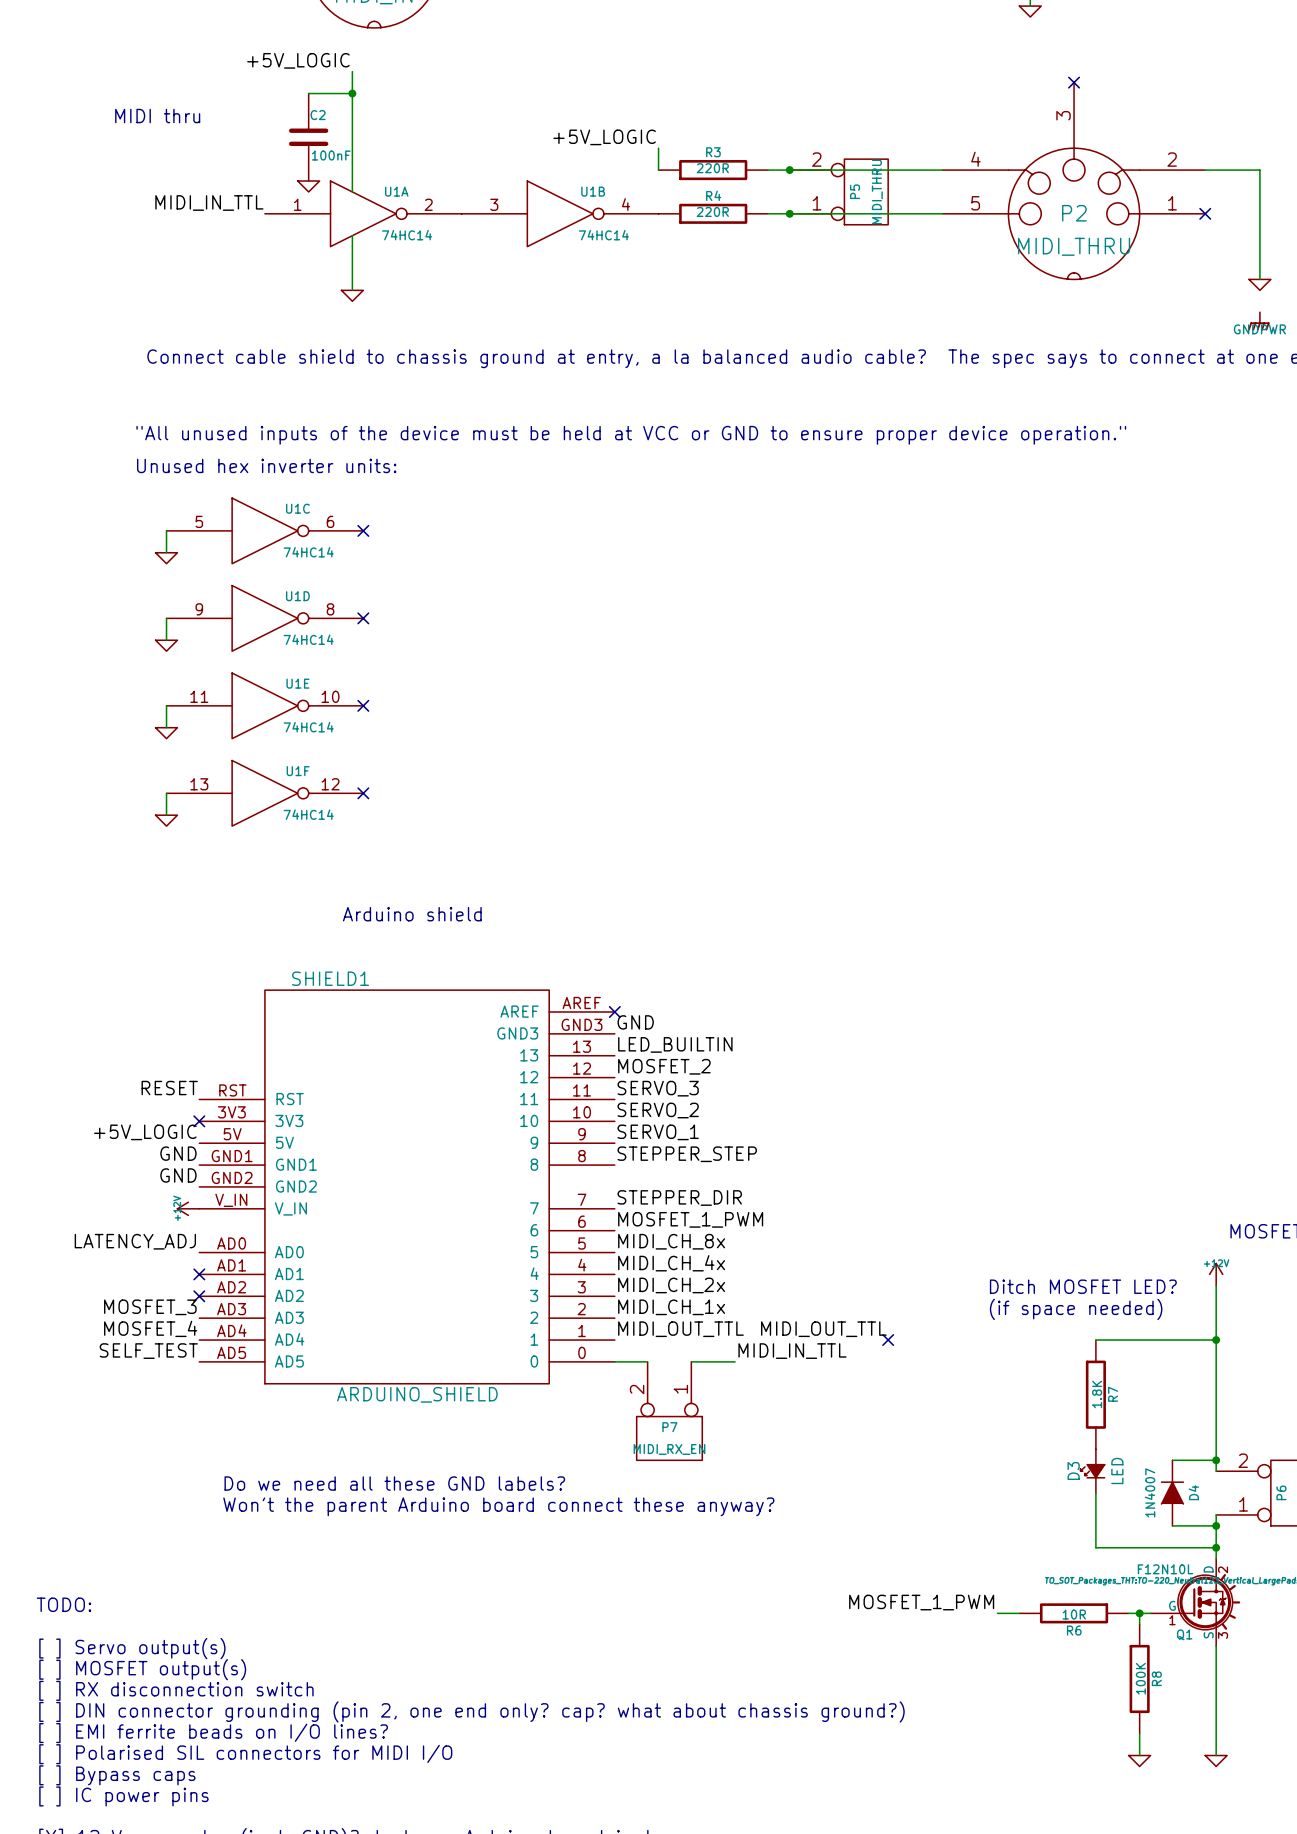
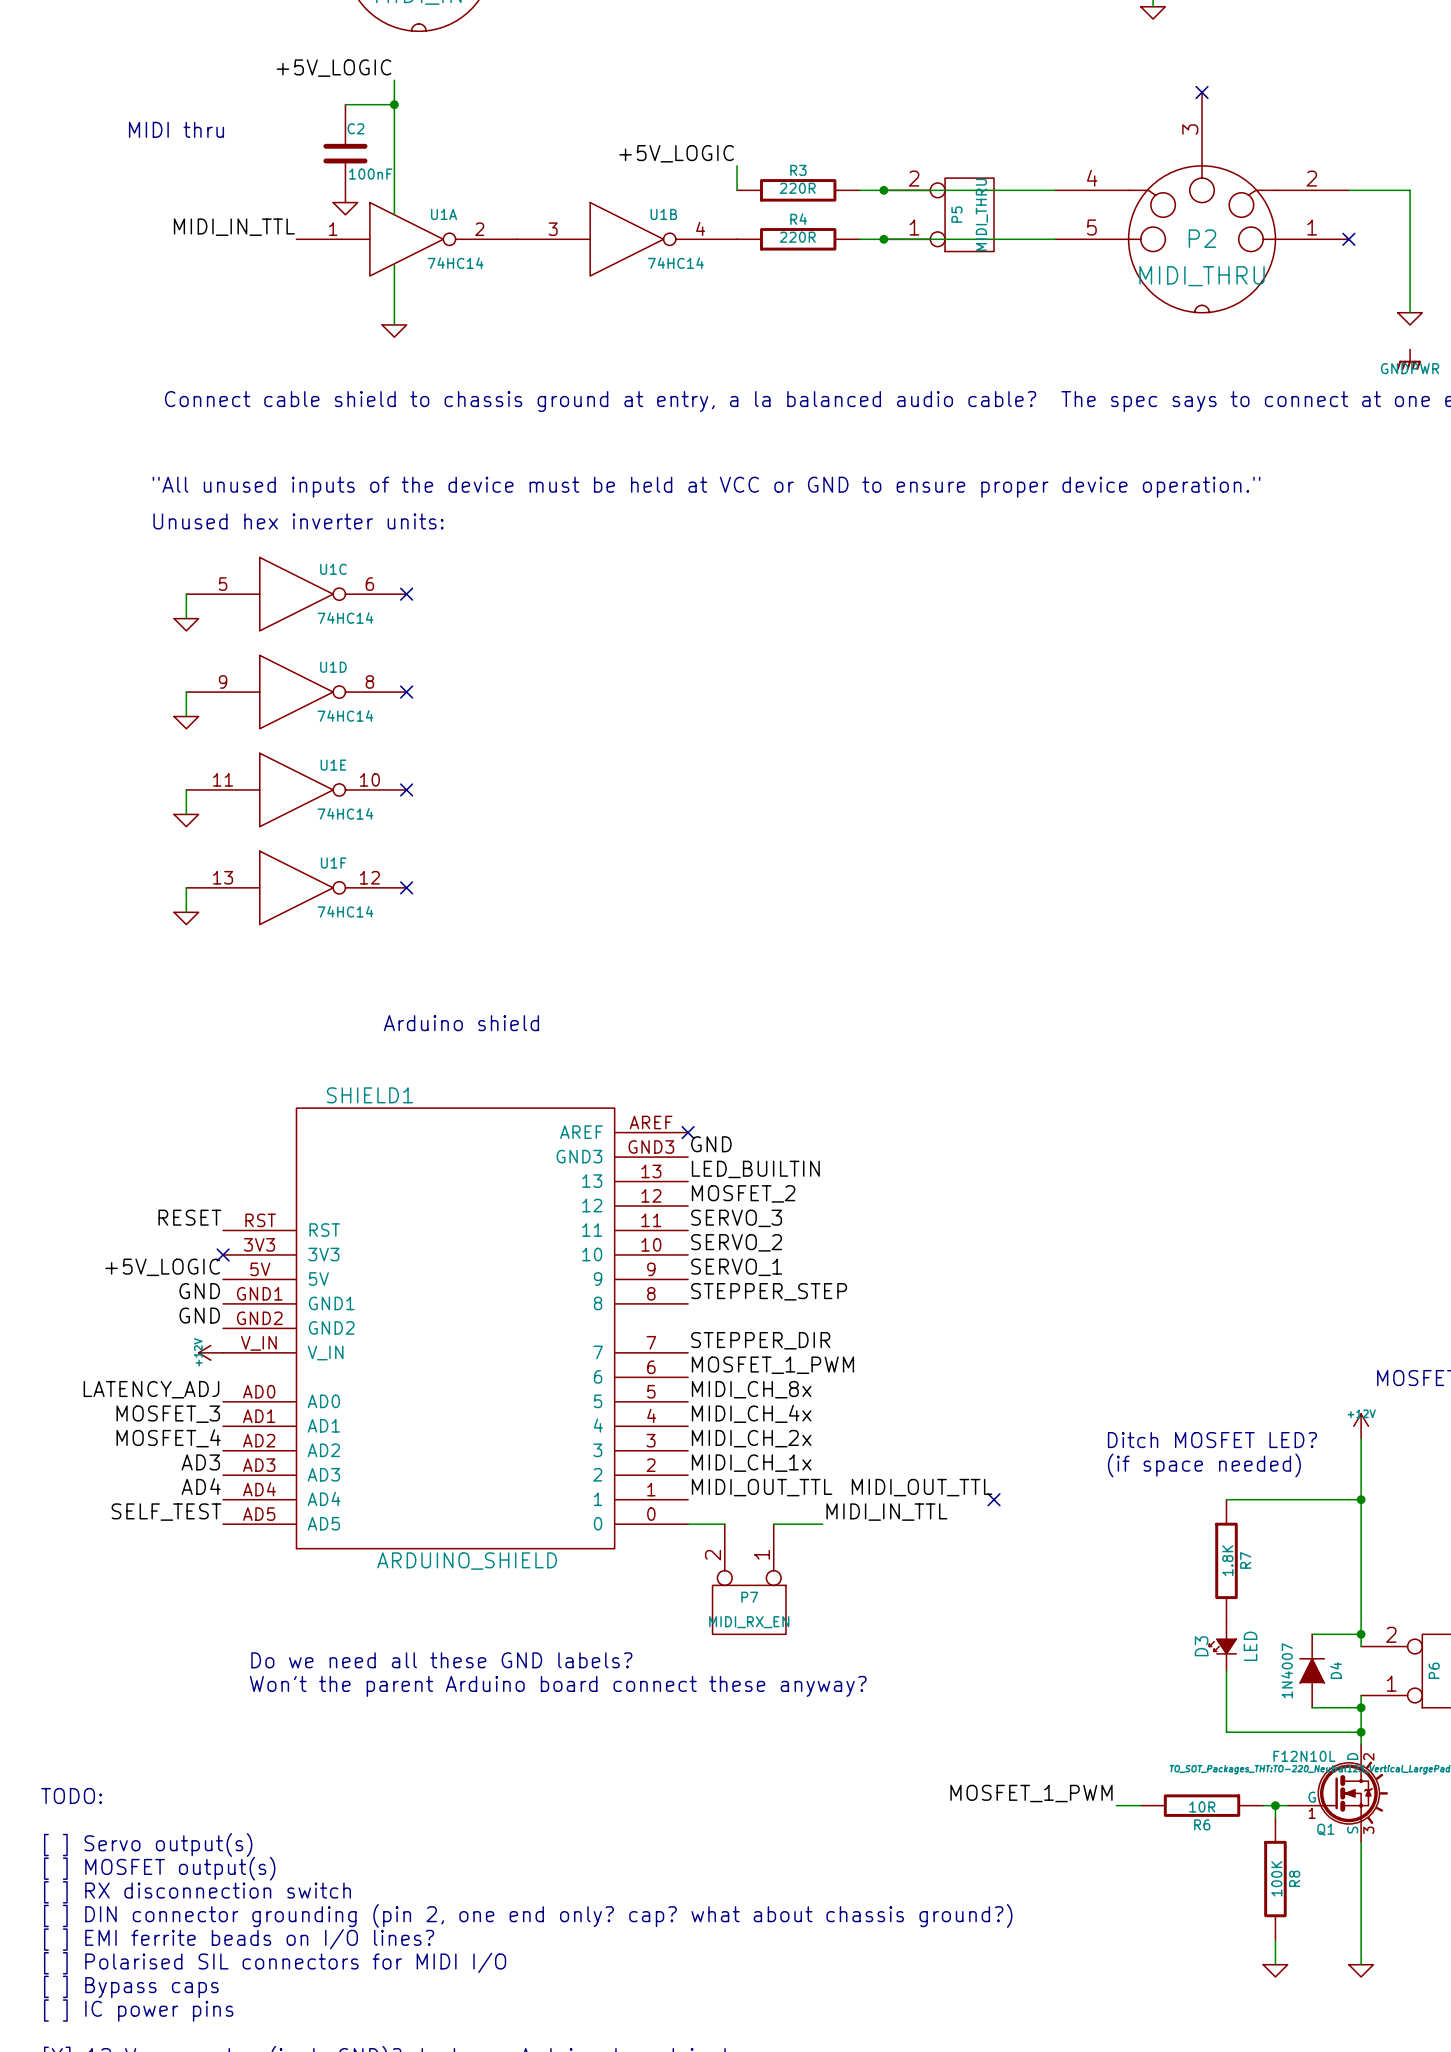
label: none -> MOSFET_3 (168, 1414)
no-connect mark: (199, 1274) -> none
label: none -> MOSFET_4 (168, 1438)
no-connect mark: (199, 1296) -> none
label: MOSFET_3 (150, 1307) -> AD3 (200, 1462)
label: MOSFET_4 (150, 1328) -> AD4 (201, 1486)

